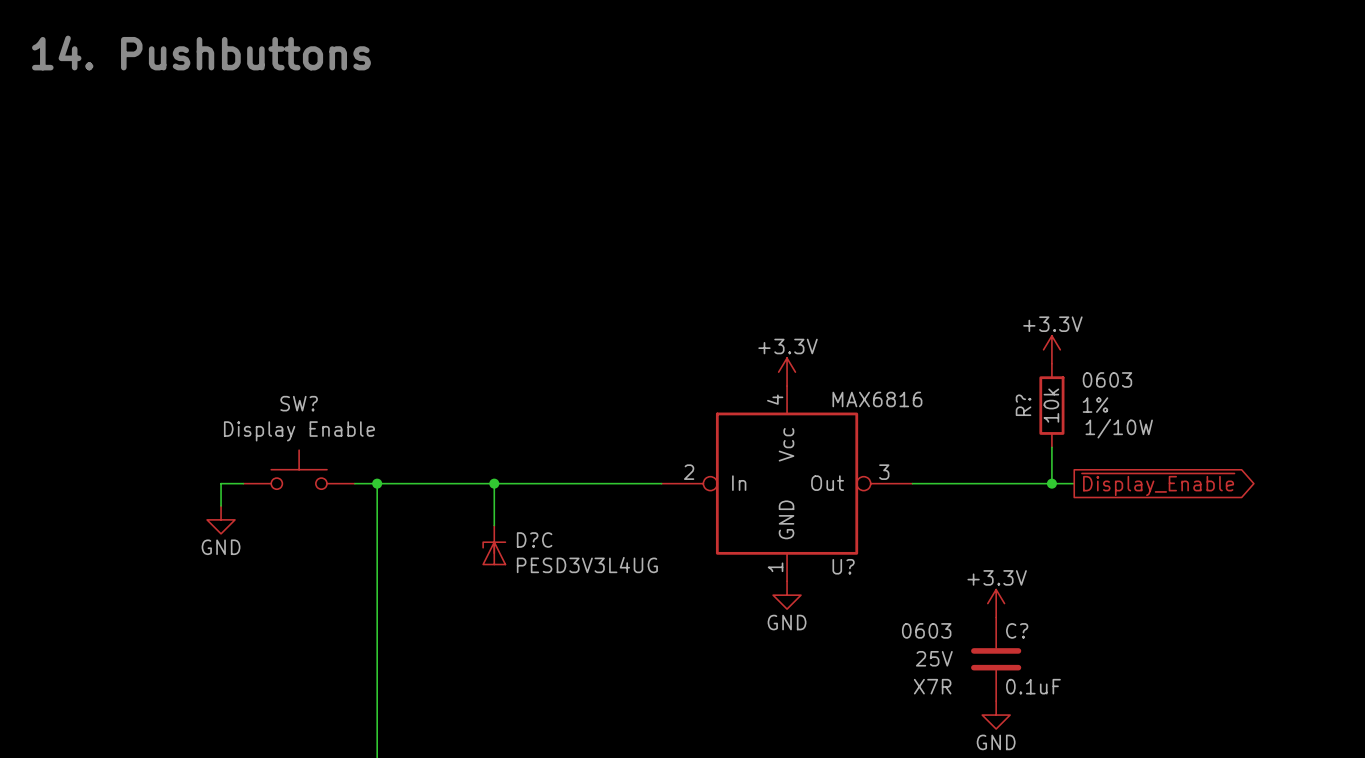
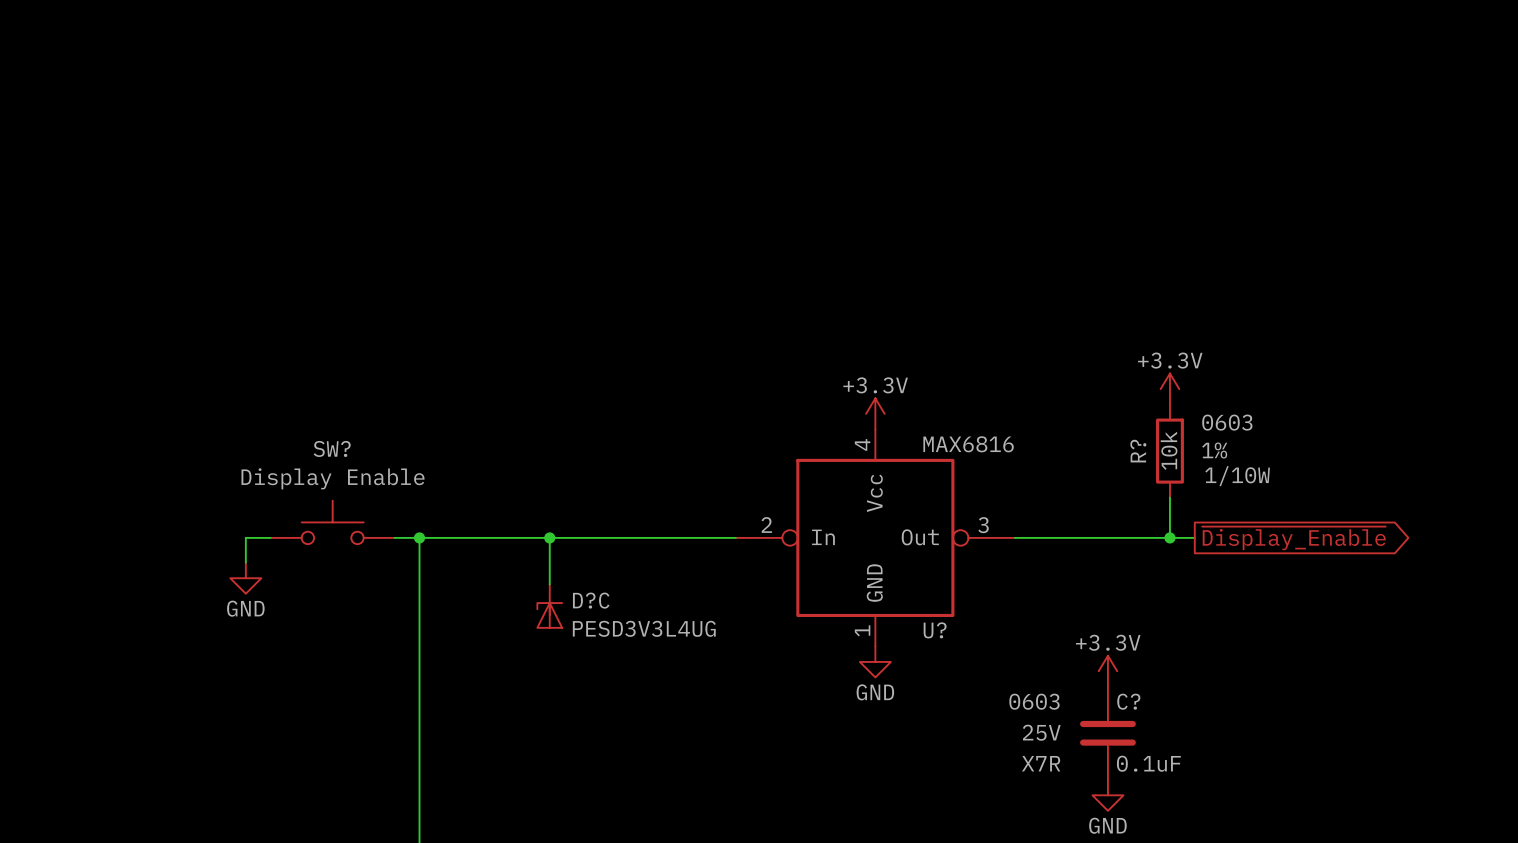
text: 14. Pushbuttons (201, 53) -> none

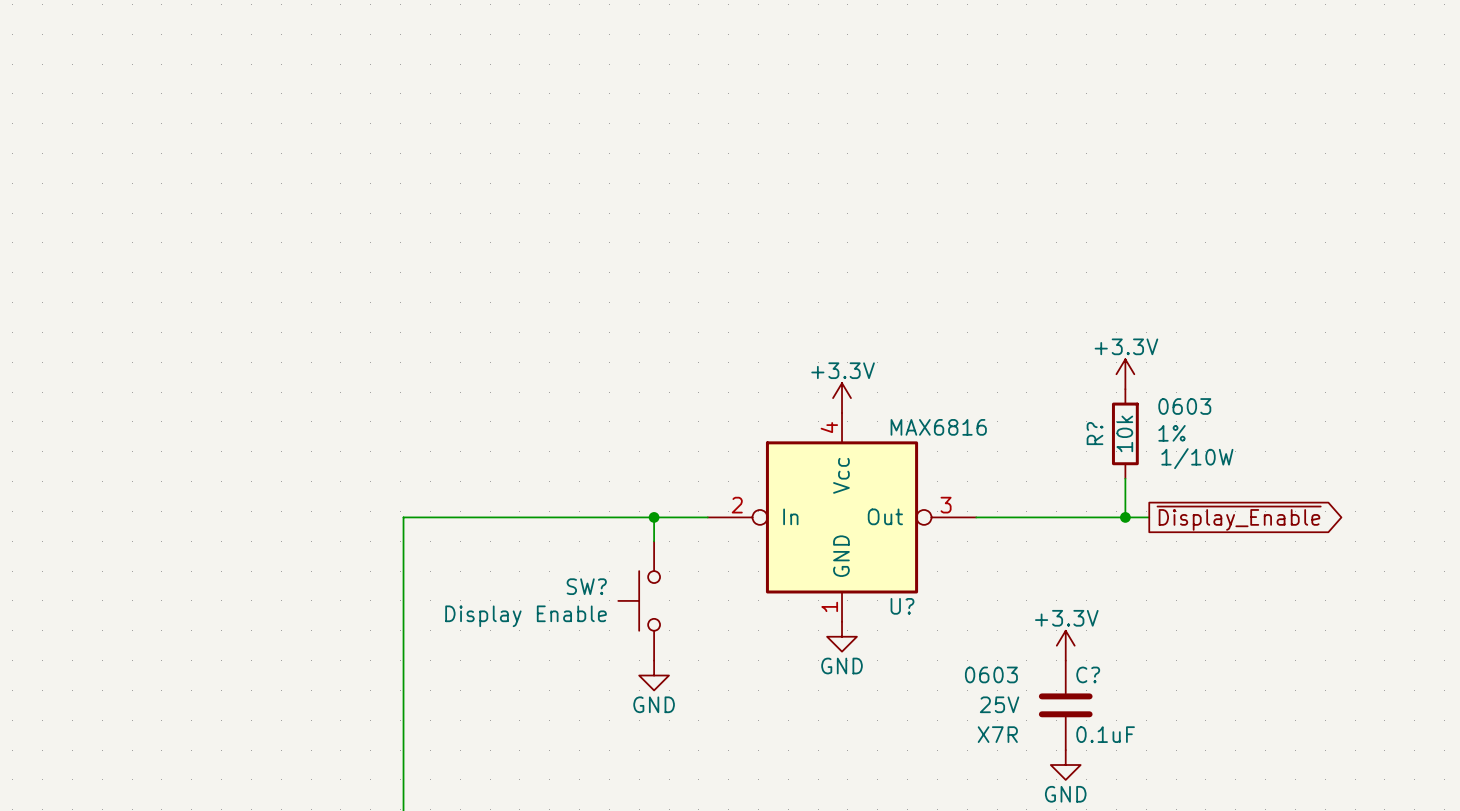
SW?: Display Enable (332, 522) -> none
wire: (270, 537) (245, 537) (245, 562) -> none
wire: (394, 537) (419, 537) -> none
junction: (419, 537) -> none
wire: (549, 537) (549, 584) -> none
junction: (549, 537) -> none
wire: none -> (654, 517) (654, 541)
junction: none -> (654, 517)
power symbol: GND (245, 578) -> none
D?C: PESD3V3L4UG (549, 606) -> none
SW?: none -> Display Enable (639, 600)
power symbol: none -> GND (654, 675)

